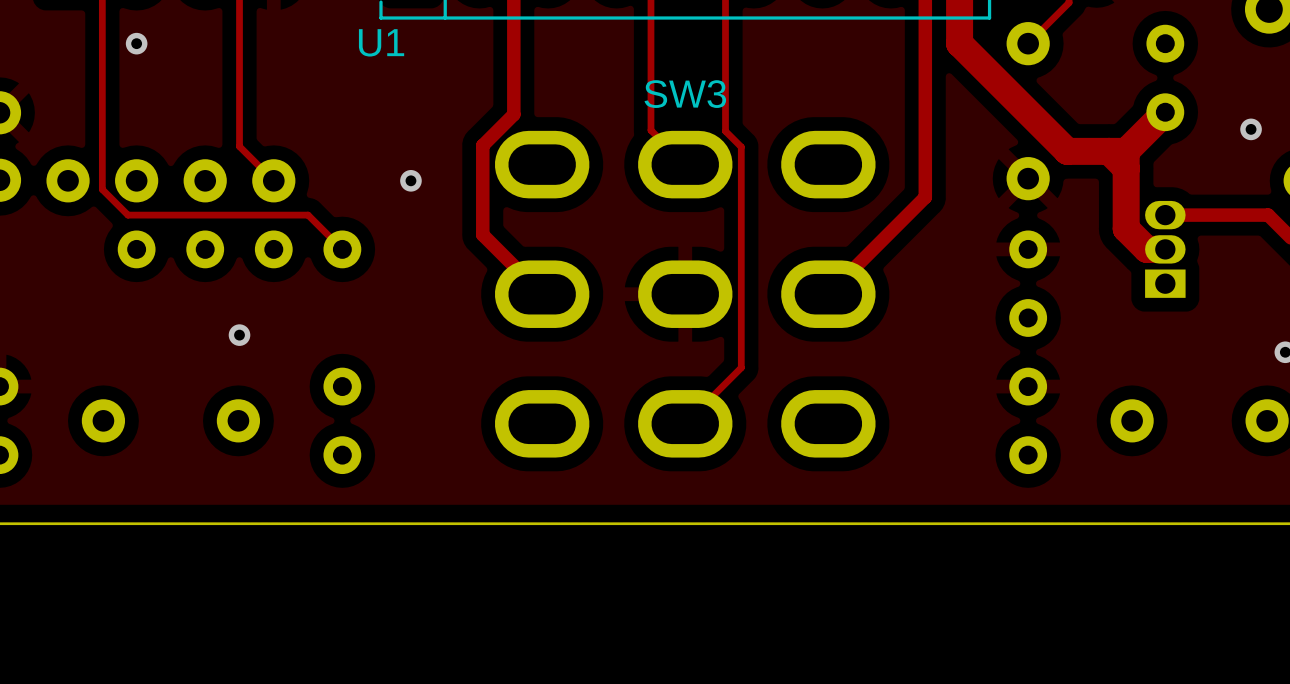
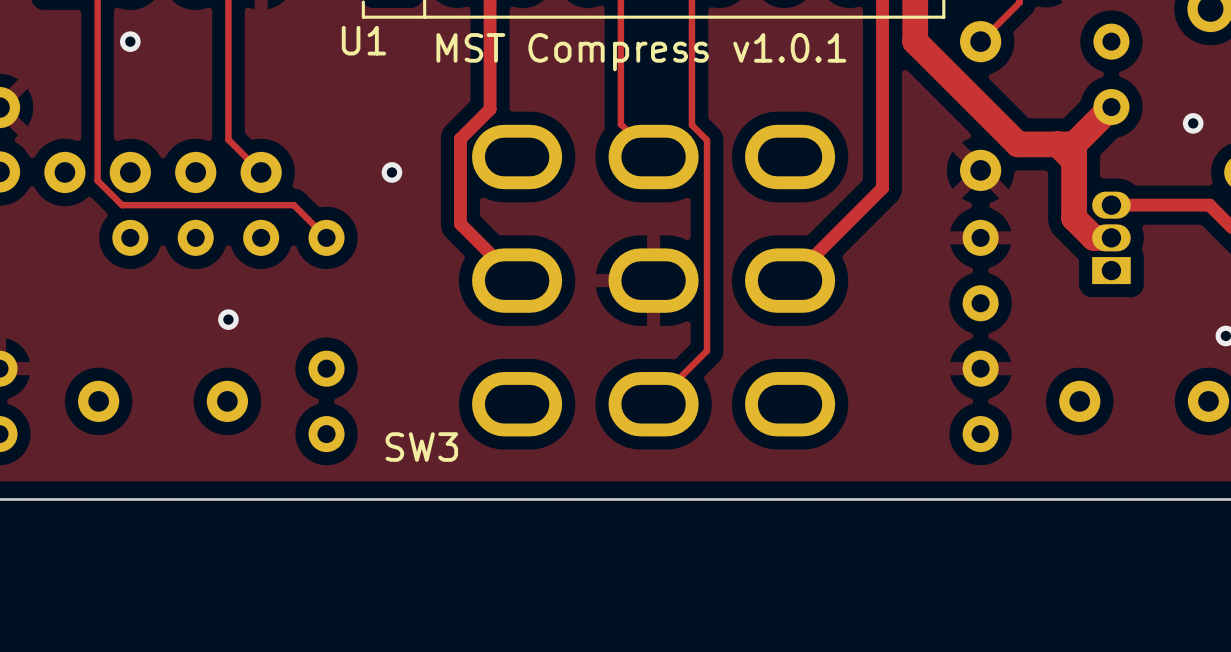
text: none -> MST Compress v1.0.1 (641, 52)
SW3 name position: SW3 (685, 94) -> SW3 (421, 447)

